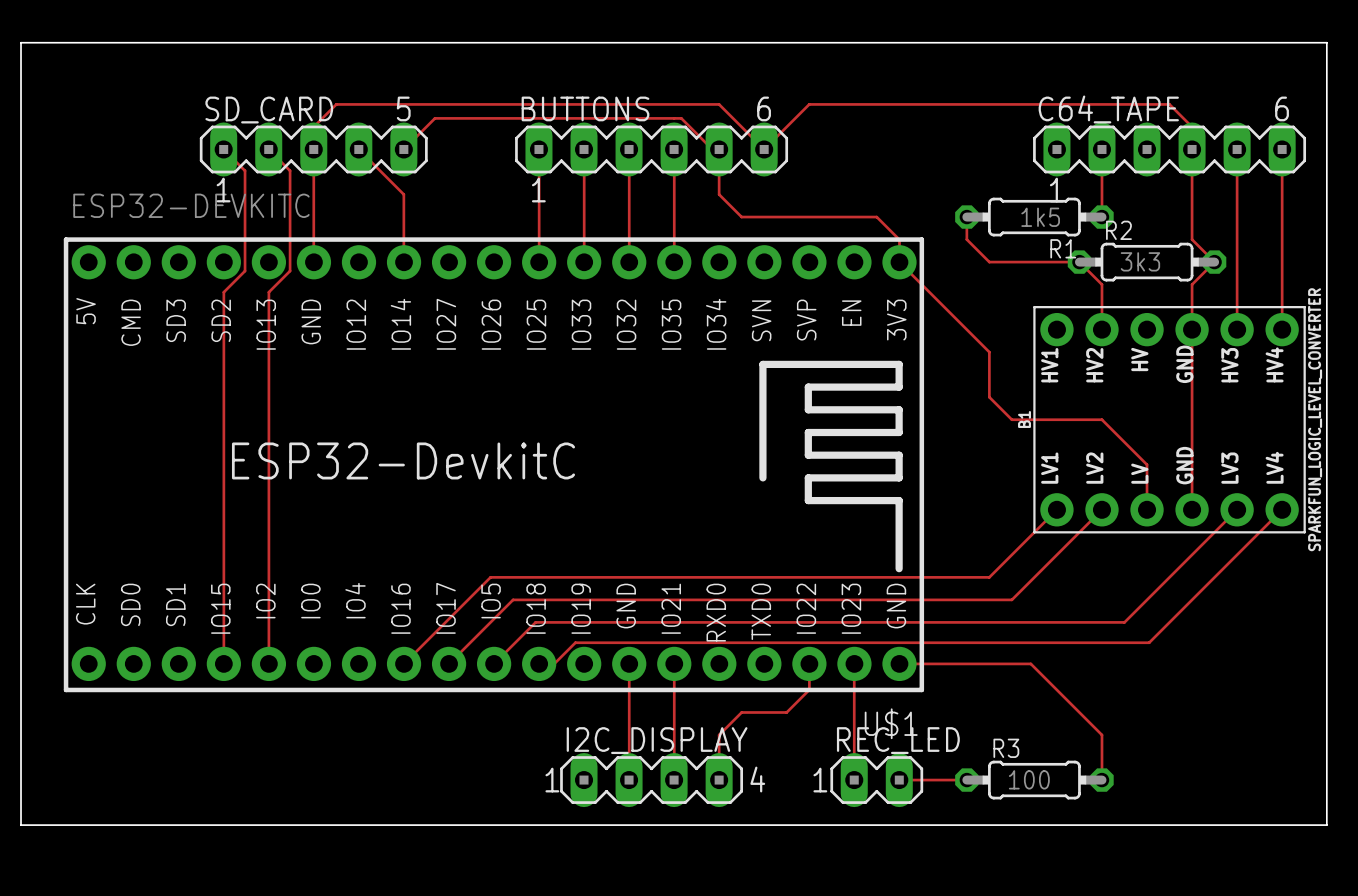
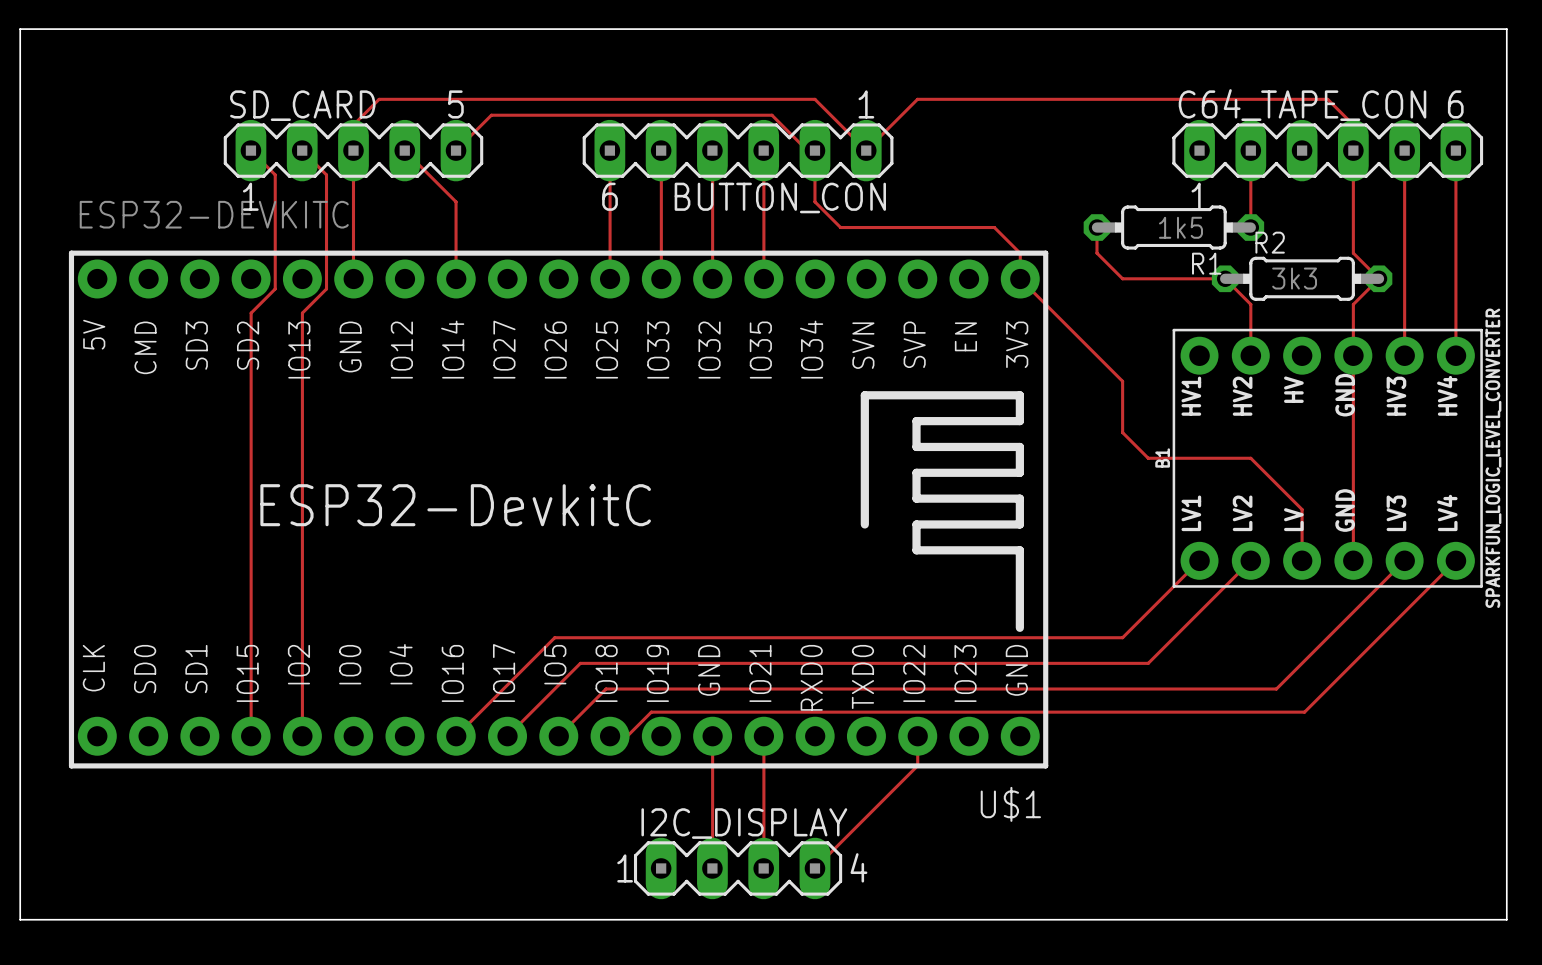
BUTTONS name: BUTTONS (585, 108) -> BUTTON_CON (780, 197)
BUTTONS text position: 6 (764, 108) -> 6 (610, 196)
C64_TAPE name: C64_TAPE (1108, 109) -> C64_TAPE_CON (1302, 105)
BUTTONS text position: 1 (538, 190) -> 1 (866, 104)
track: (899, 663) (1030, 663) (1101, 735) (1101, 780) -> none
track: (854, 664) (854, 780) -> none
track: (786, 712) (741, 712) (719, 735) (719, 780) -> (891, 791) (814, 868)
REC_LED: (876, 780) -> none
track: (899, 780) (966, 780) -> none
R3: 100 (1034, 780) -> none

